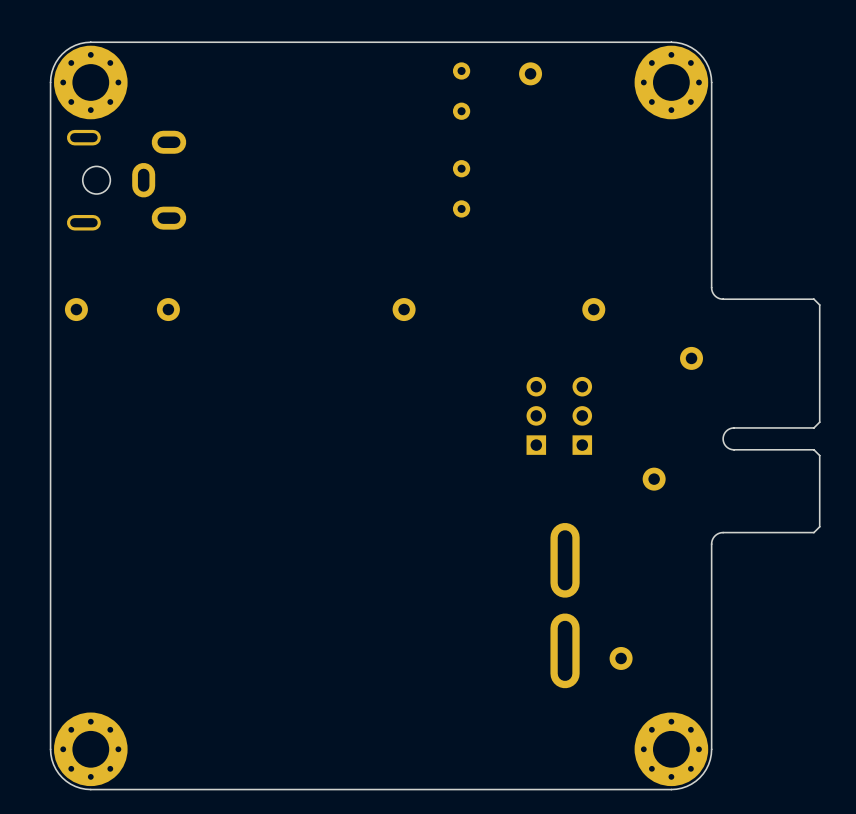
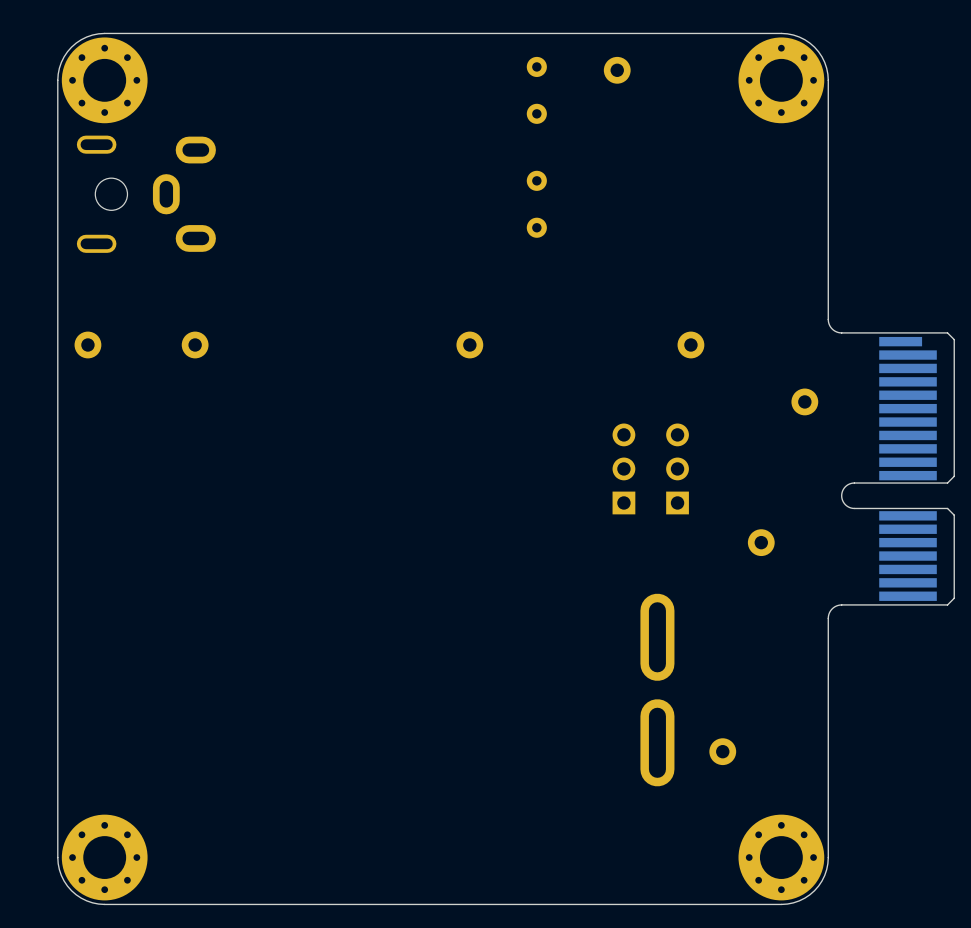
part footprint: [49, 41, 821, 791] -> [57, 32, 955, 906]

